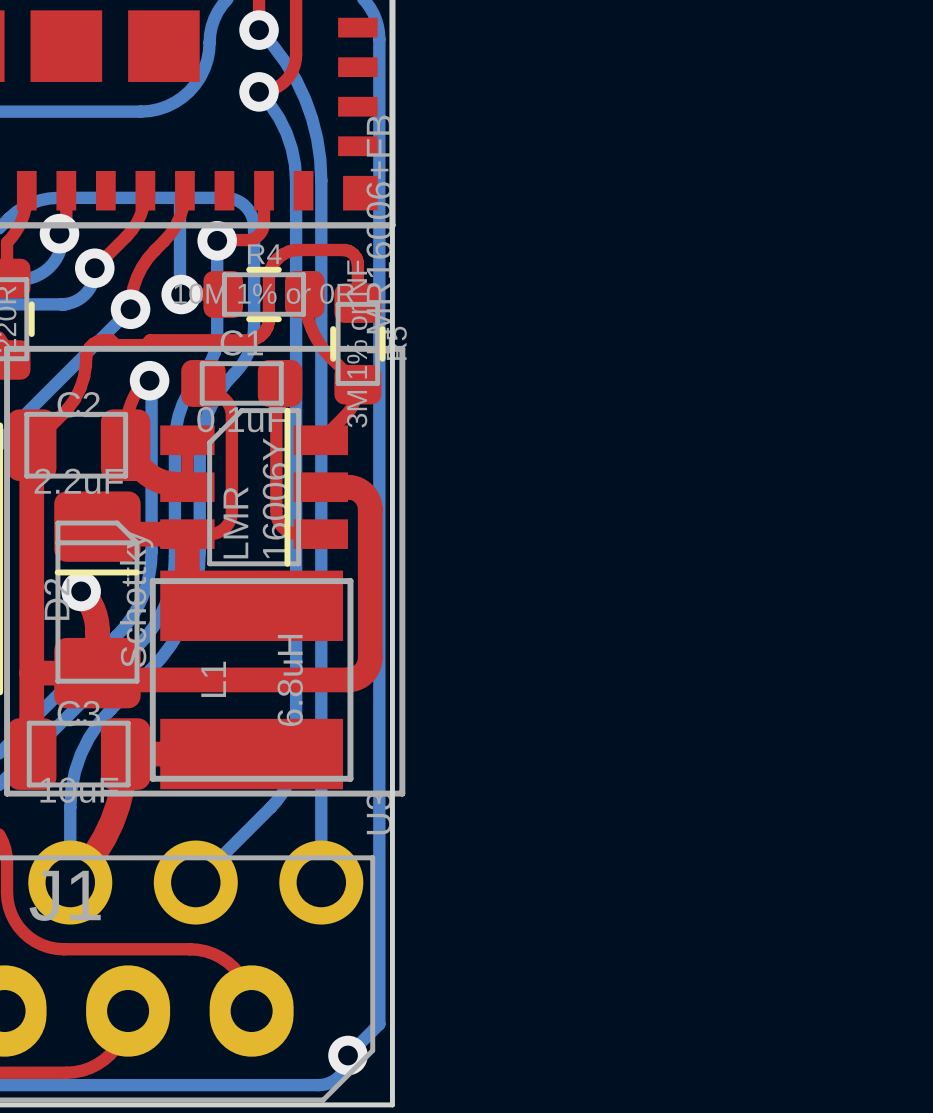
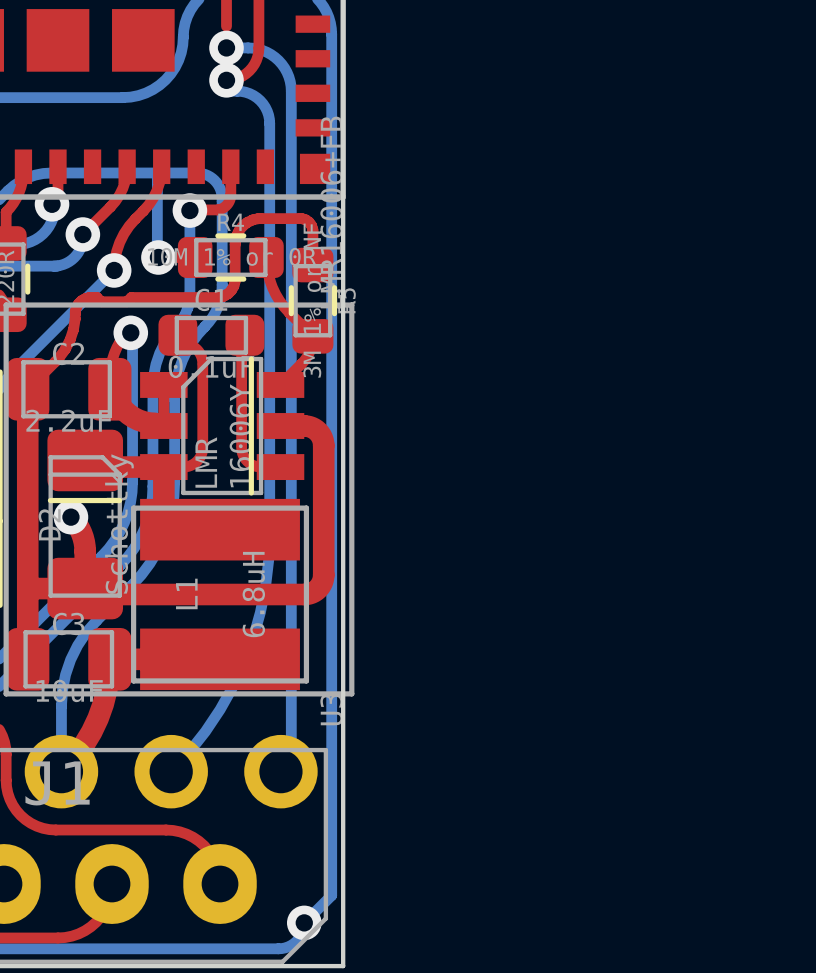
bottom track: (259, 30) (273, 45) (296, 80) (312, 118) (320, 159) (321, 882) -> (226, 47) (252, 48) (271, 54) (284, 68) (291, 86) (291, 761) (288, 768) (280, 771)
via position: (259, 30) -> (226, 47)
bottom track: (259, 91) (279, 118) (286, 132) (295, 164) (296, 181) (295, 755) (289, 779) (276, 801) (195, 882) -> (226, 91) (241, 91) (253, 95) (265, 107) (269, 119) (268, 560) (260, 612) (244, 662) (220, 709) (205, 731) (171, 771)

